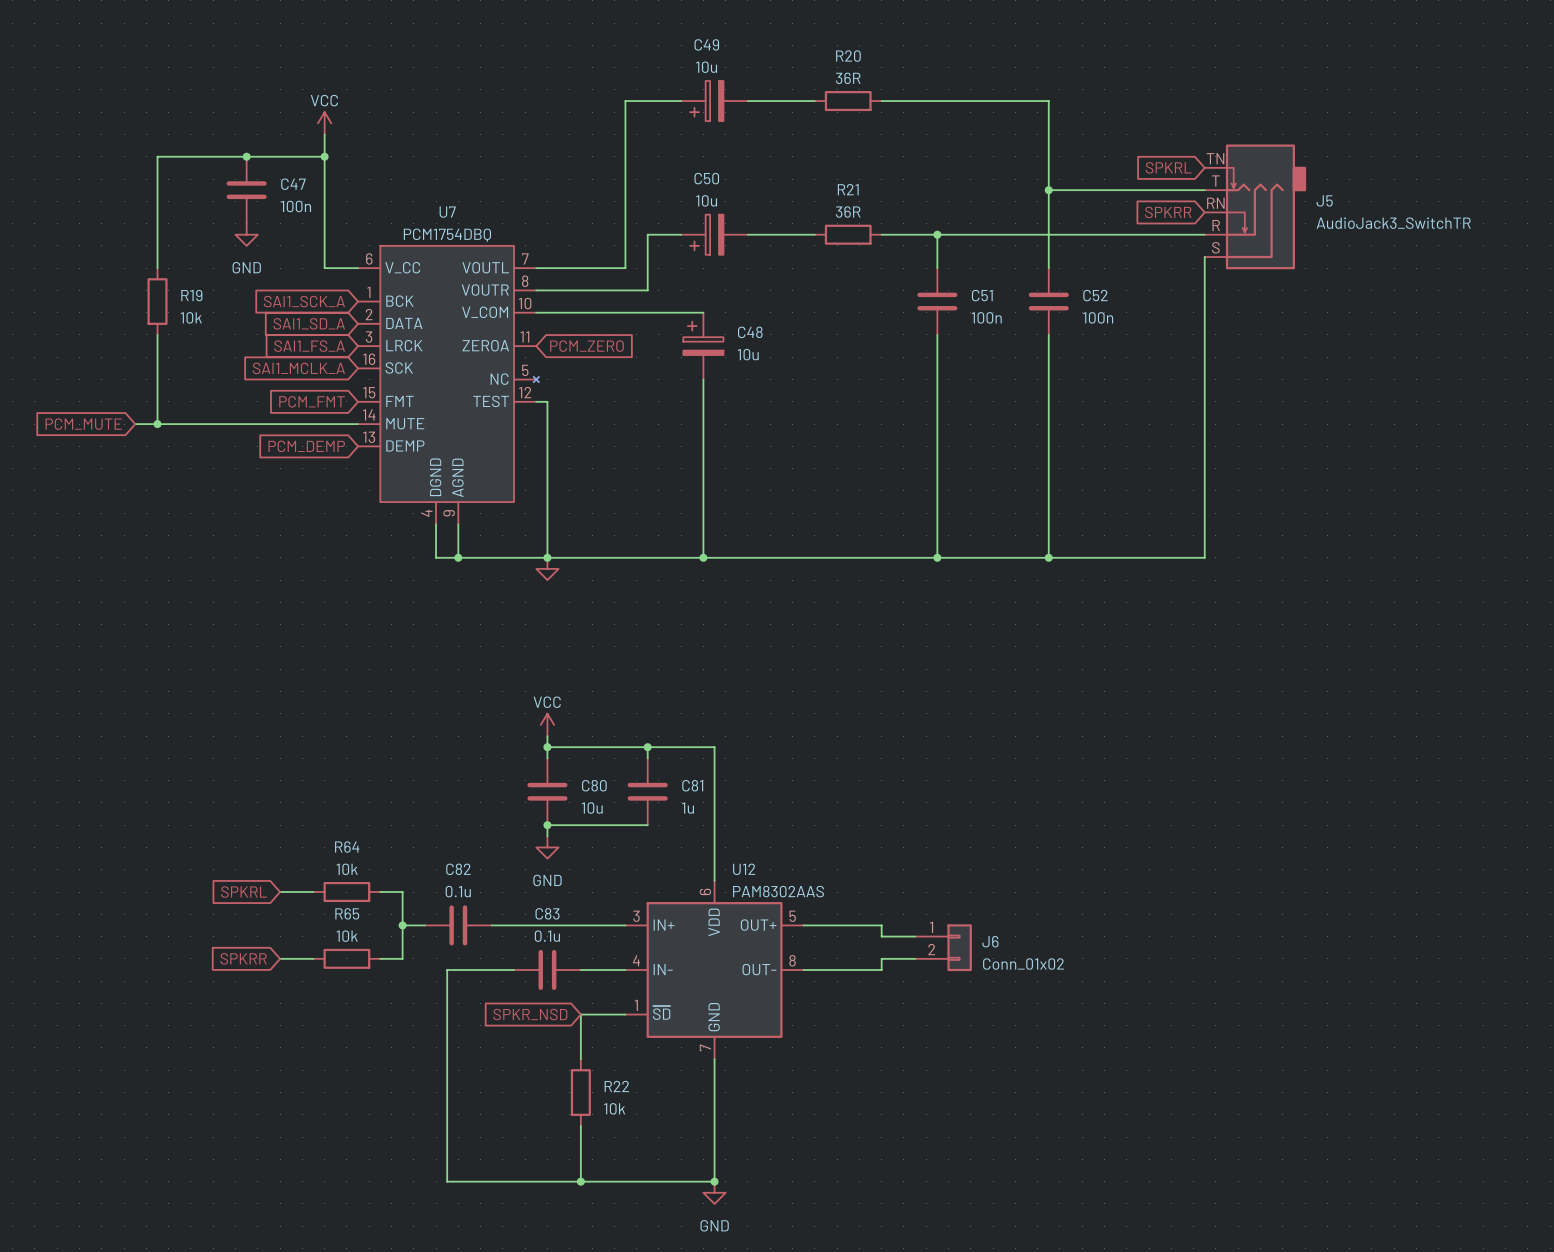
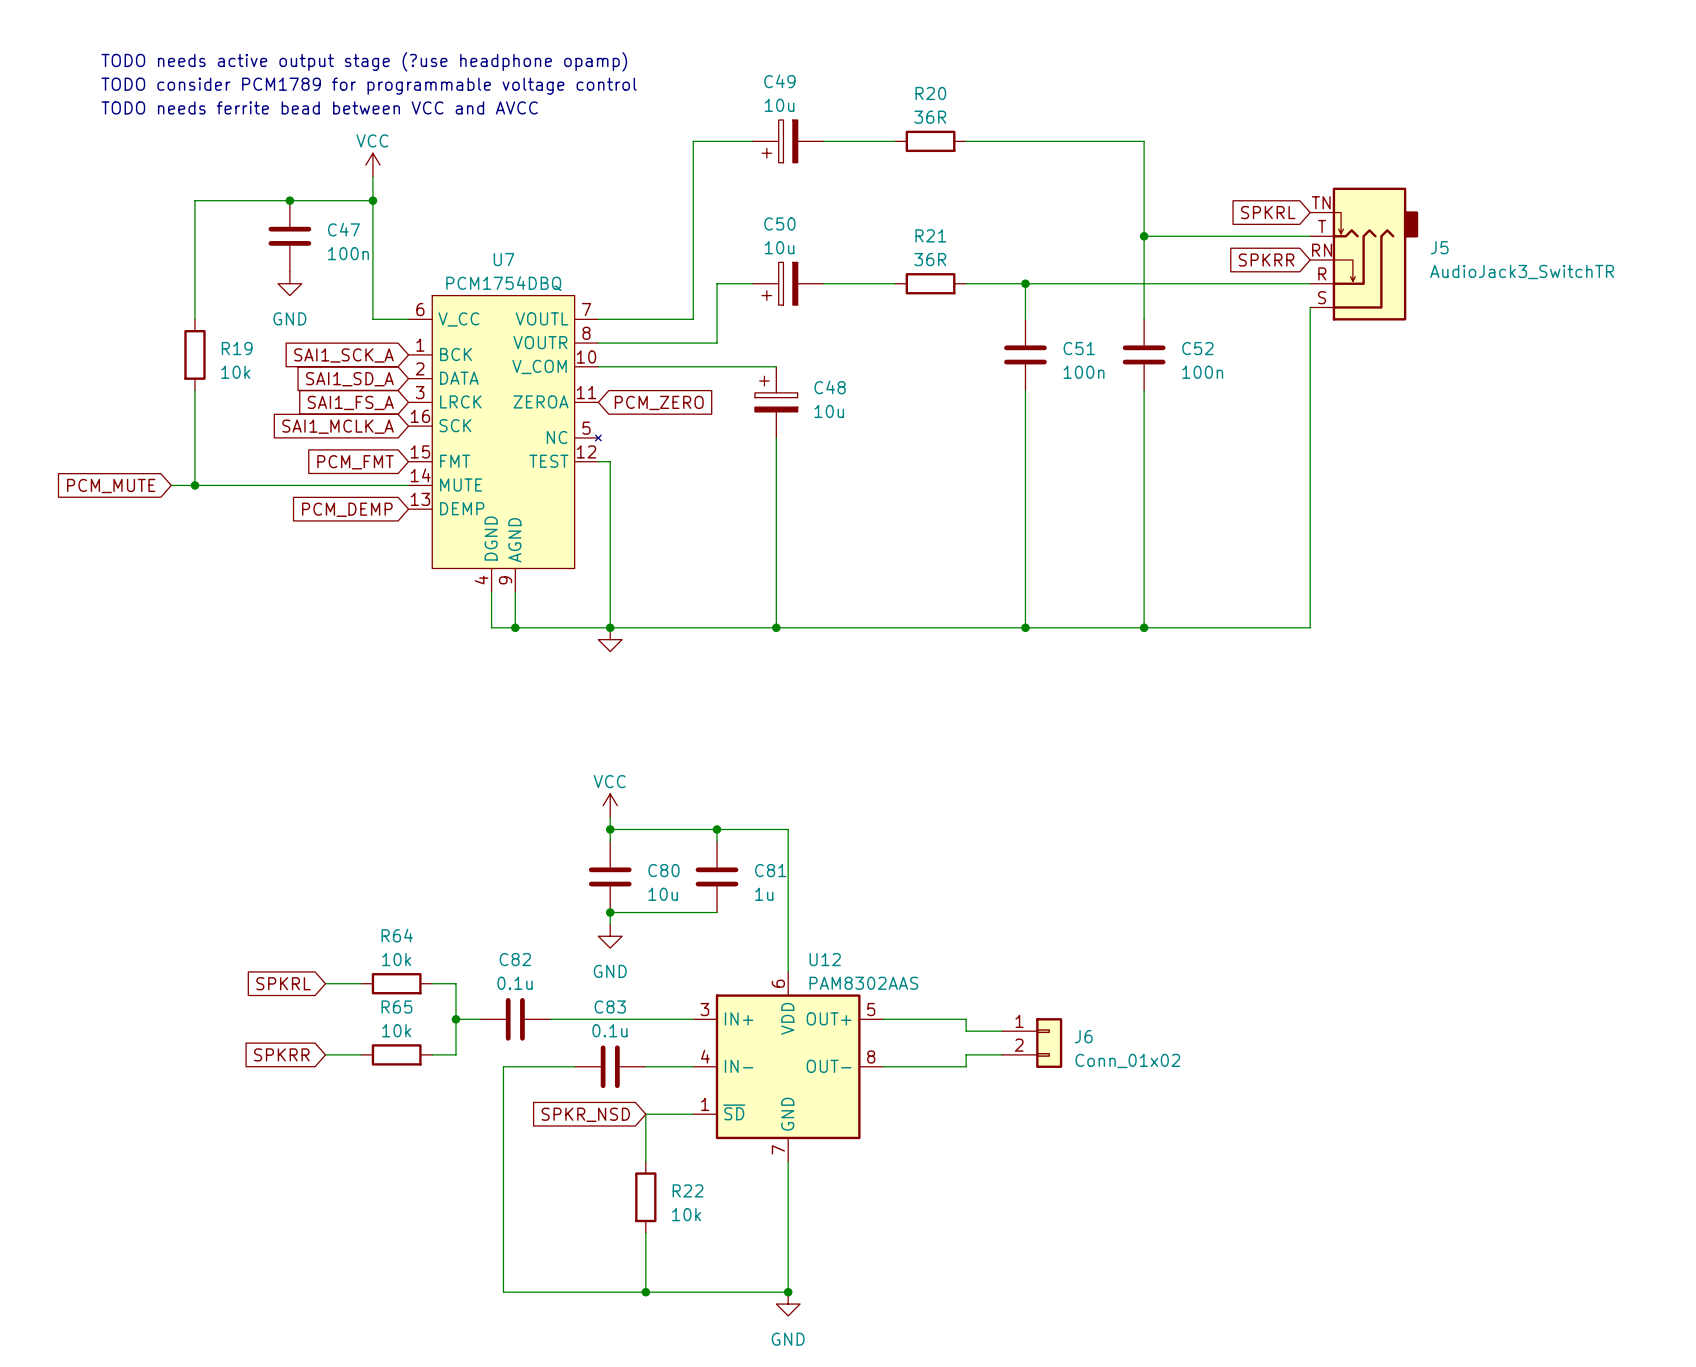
text: none -> TODO needs active output stage (?use headphone opamp) (364, 61)
text: none -> TODO consider PCM1789 for programmable voltage control (369, 86)
text: none -> TODO needs ferrite bead between VCC and AVCC (319, 107)

